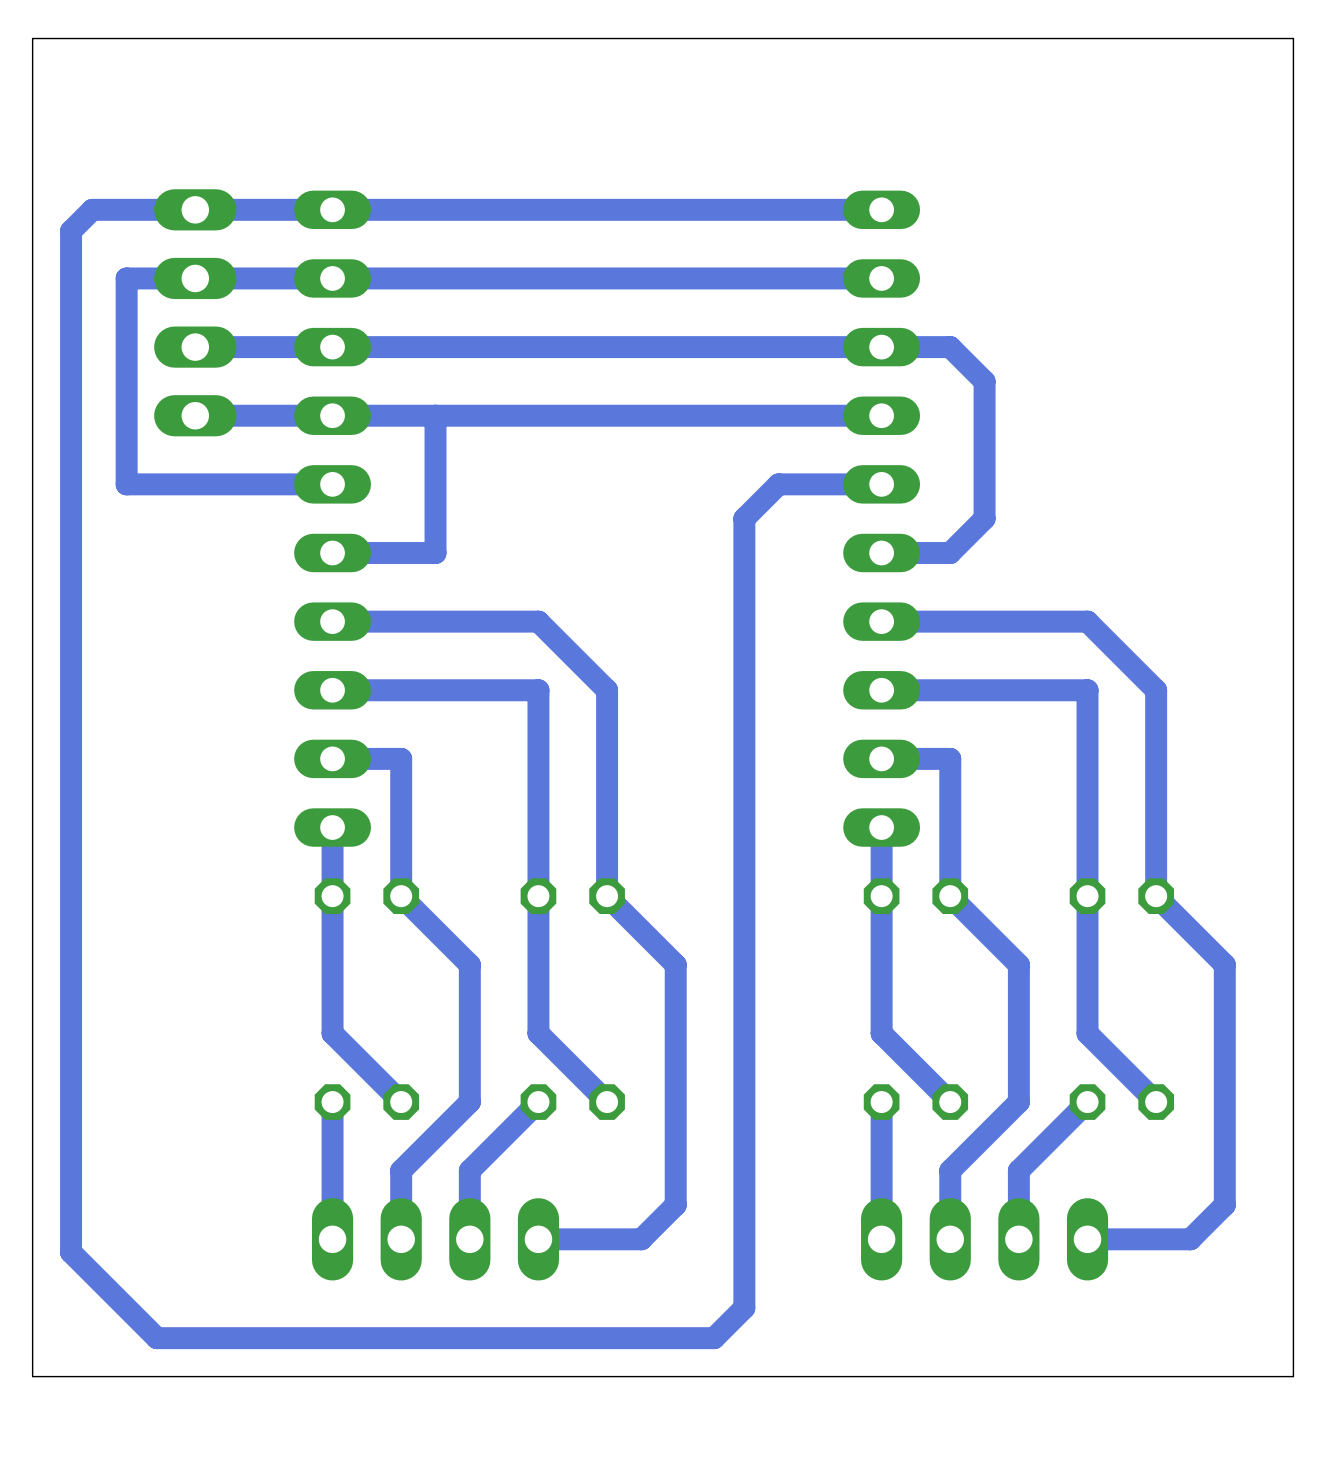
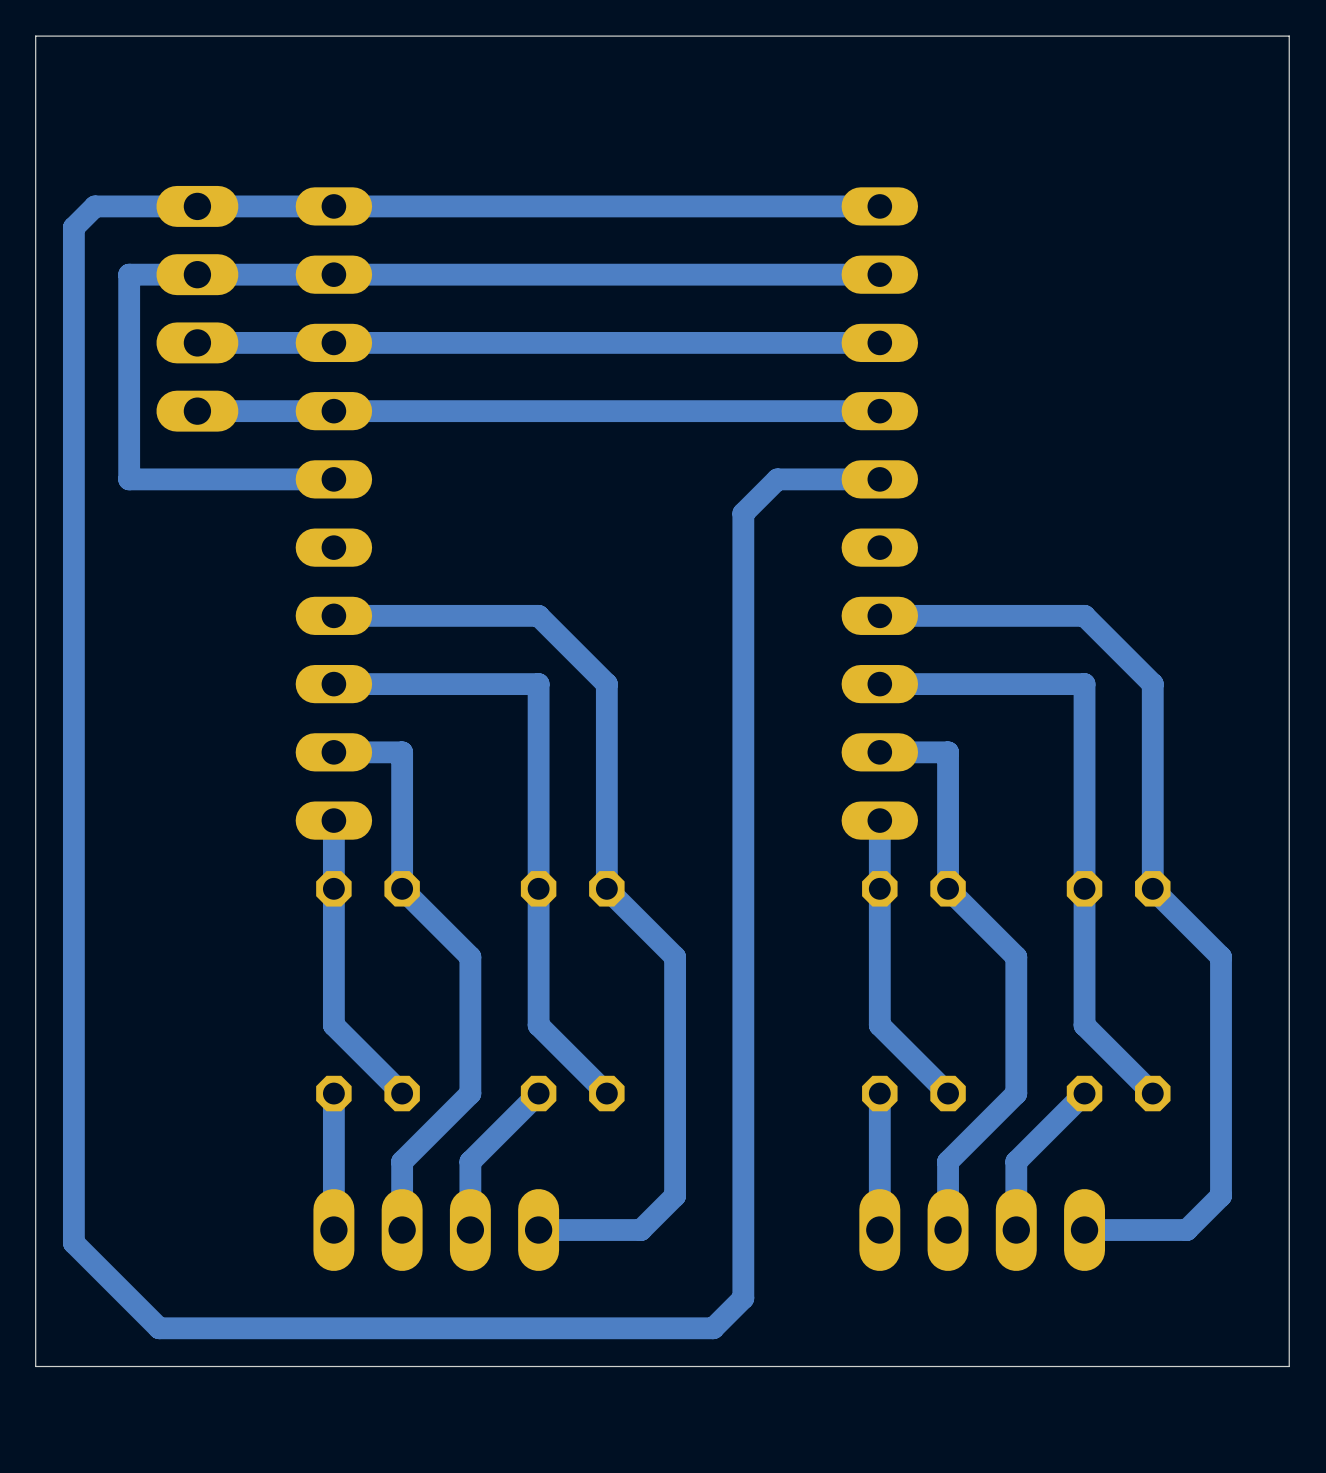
track: (881, 347) (950, 347) (984, 381) (984, 518) (950, 553) (881, 553) -> none
track: (435, 415) (435, 553) (332, 553) -> none

